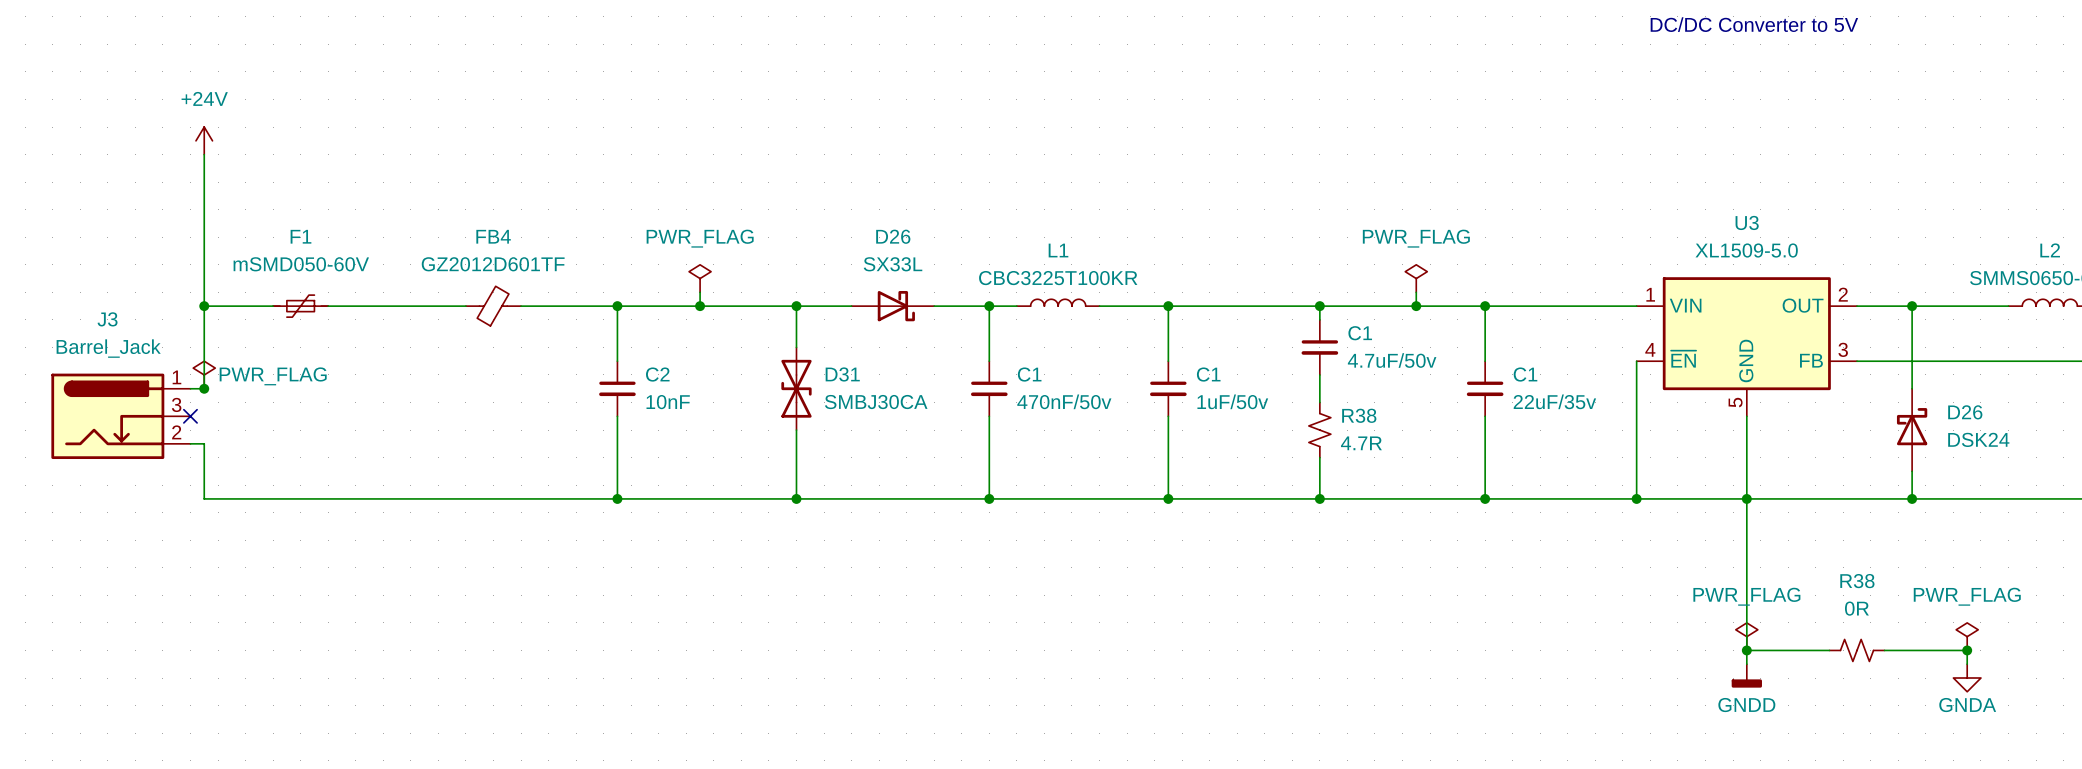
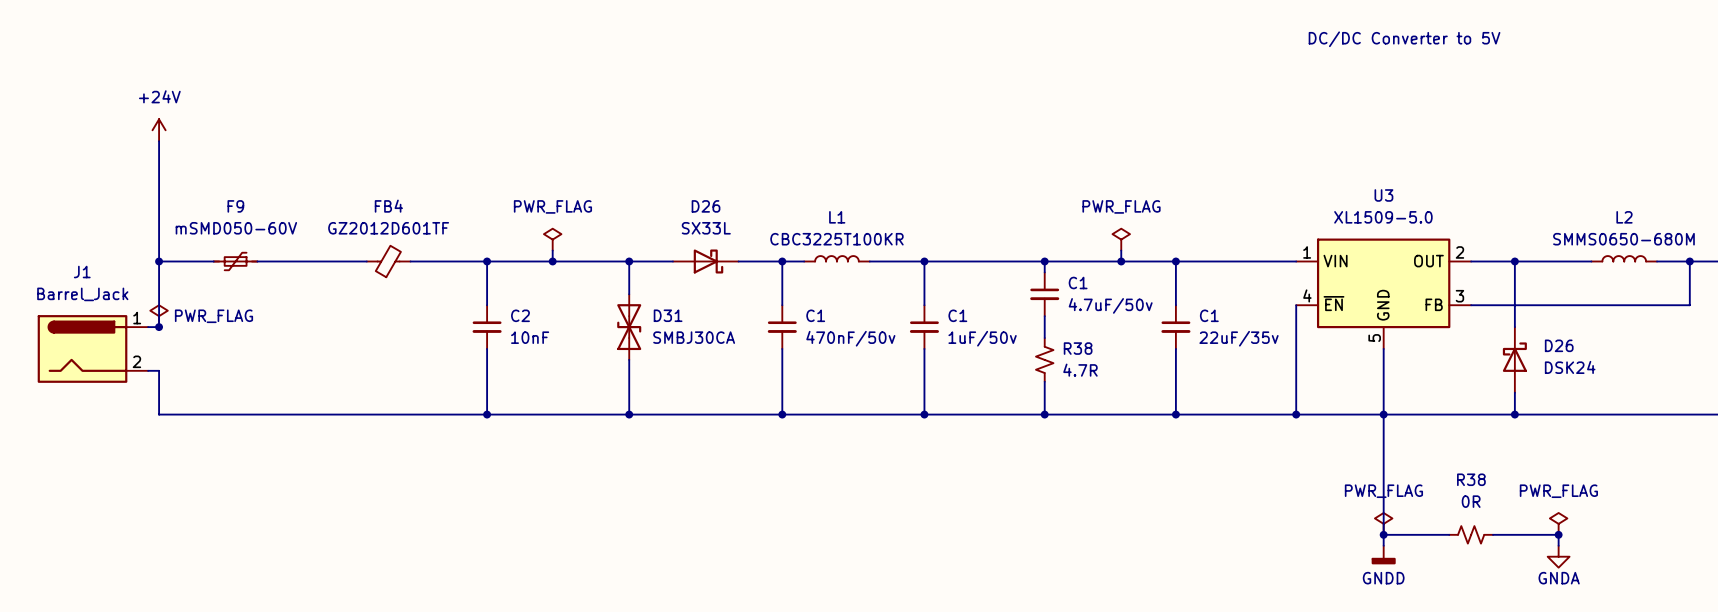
F1 name: F1 (300, 236) -> F9 (235, 206)
J3: Barrel_Jack (120, 416) -> none
J1: none -> Barrel_Jack (92, 348)
no-connect mark: (190, 416) -> none

